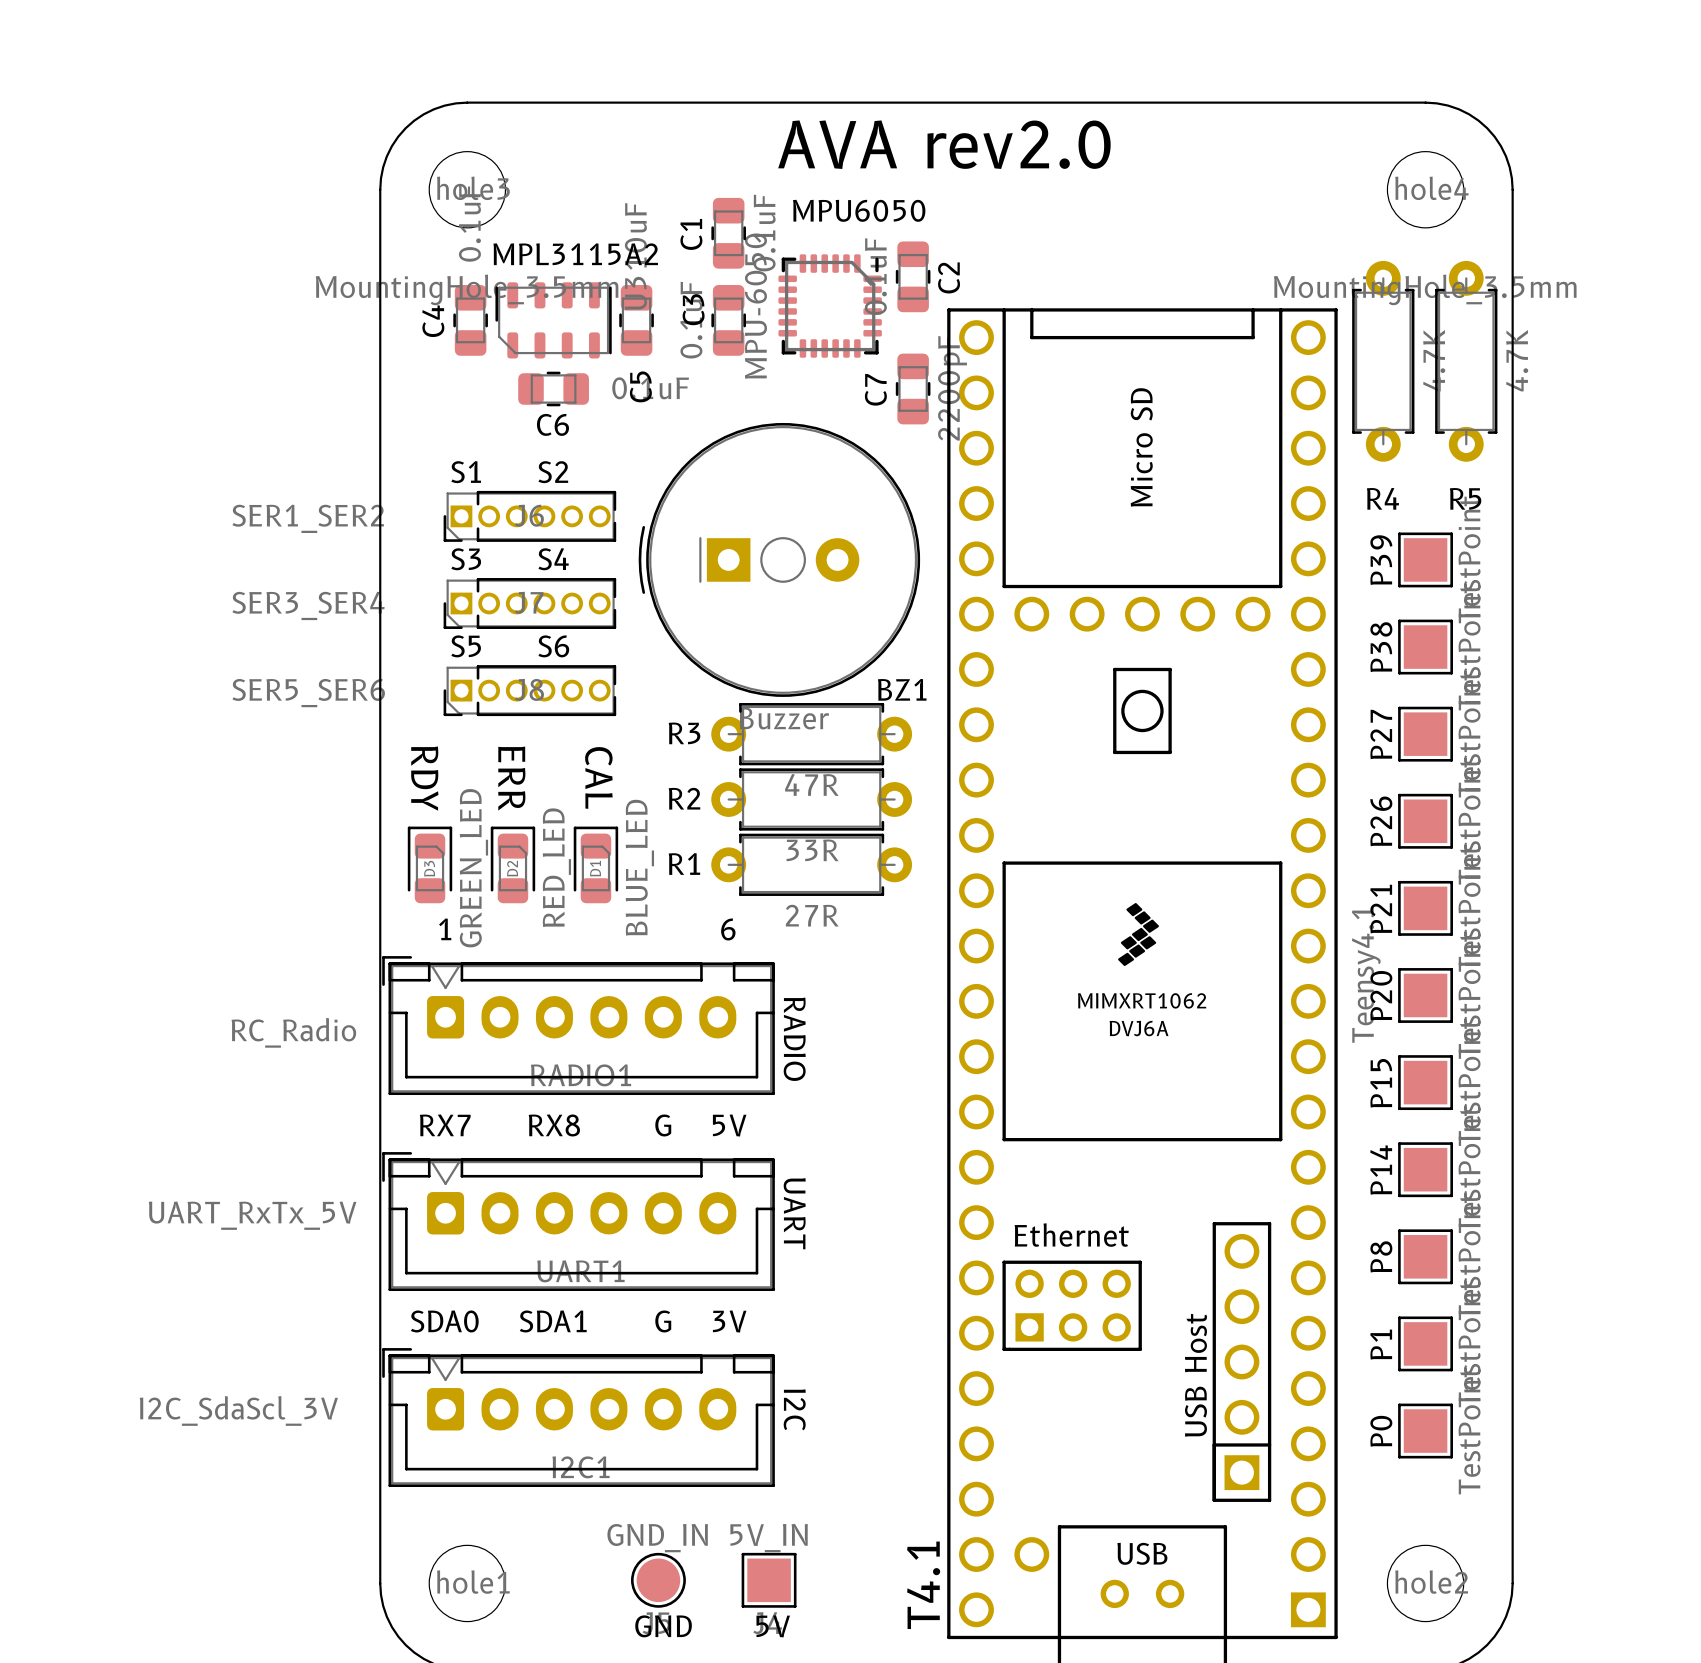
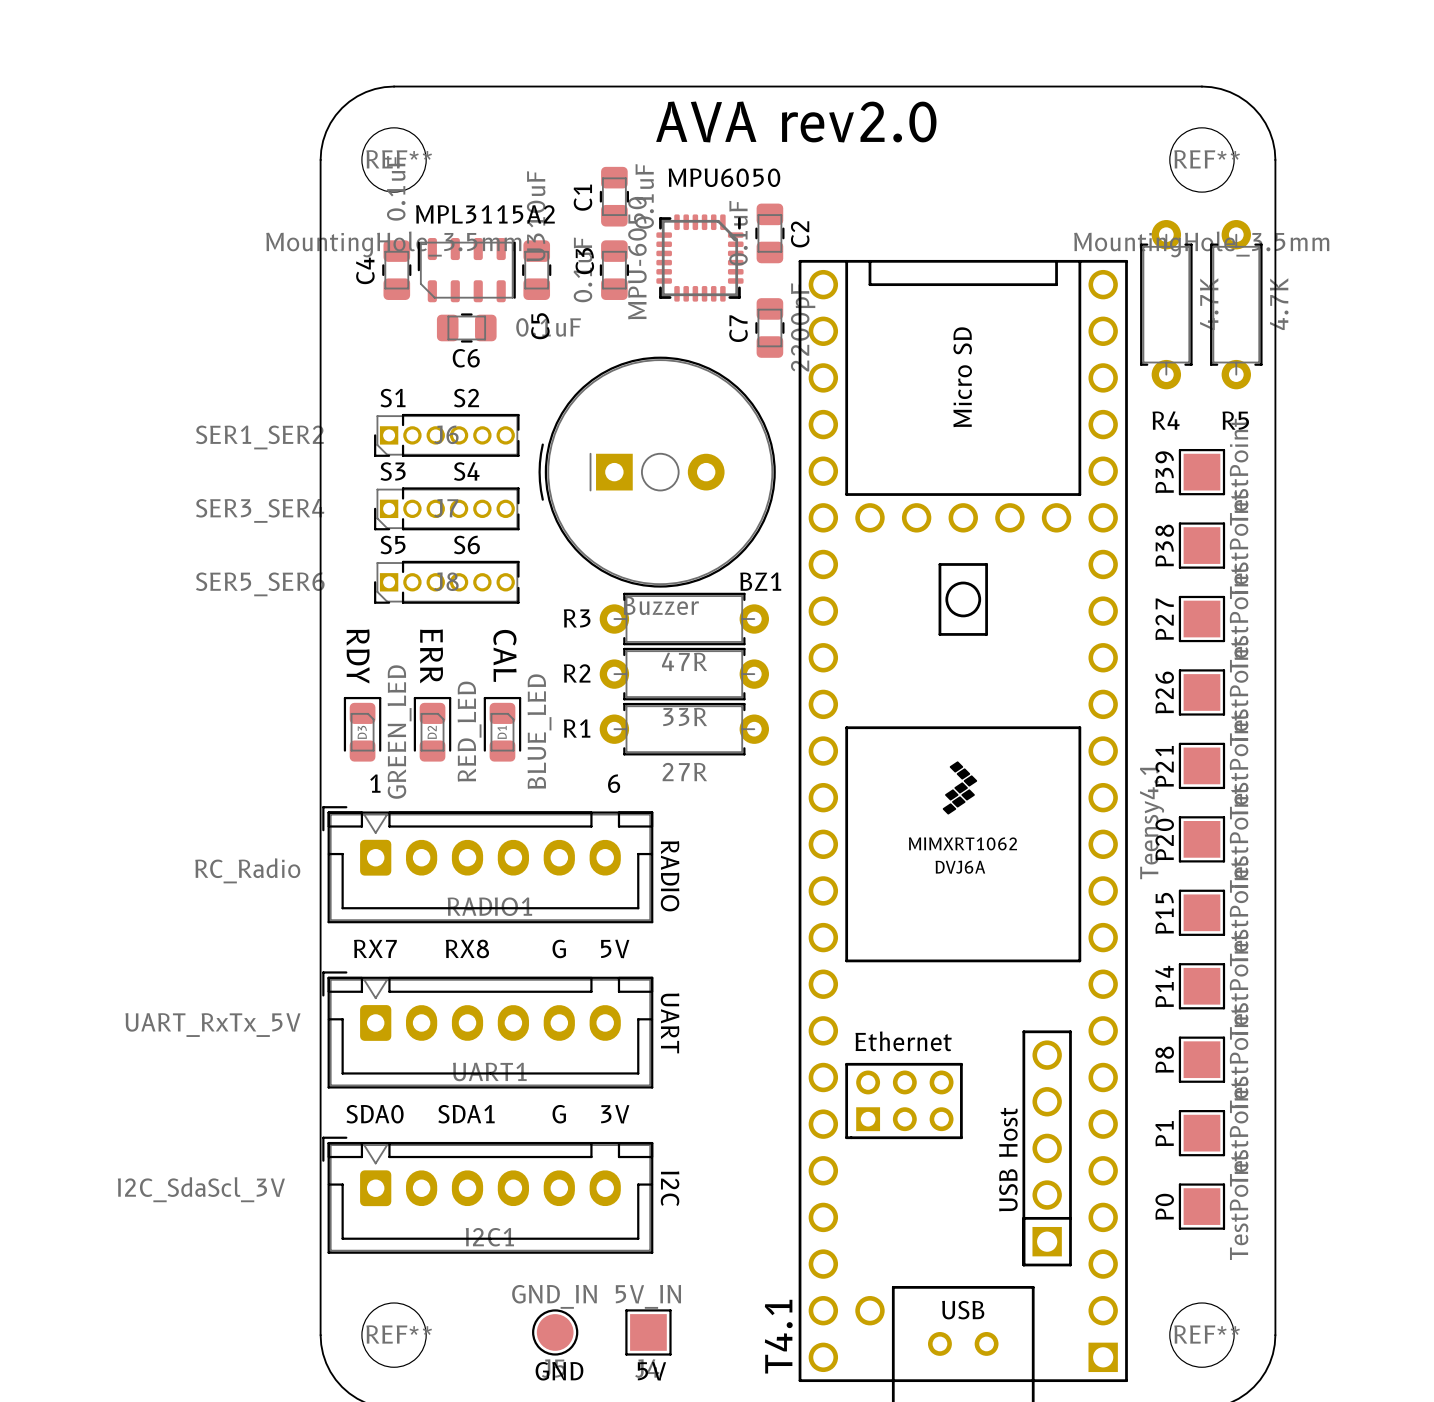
hole3 name: hole3 (473, 188) -> REF** (399, 159)
hole4 name: hole4 (1431, 188) -> REF** (1207, 159)
hole1 name: hole1 (473, 1582) -> REF** (399, 1334)
hole2 name: hole2 (1431, 1582) -> REF** (1207, 1334)

